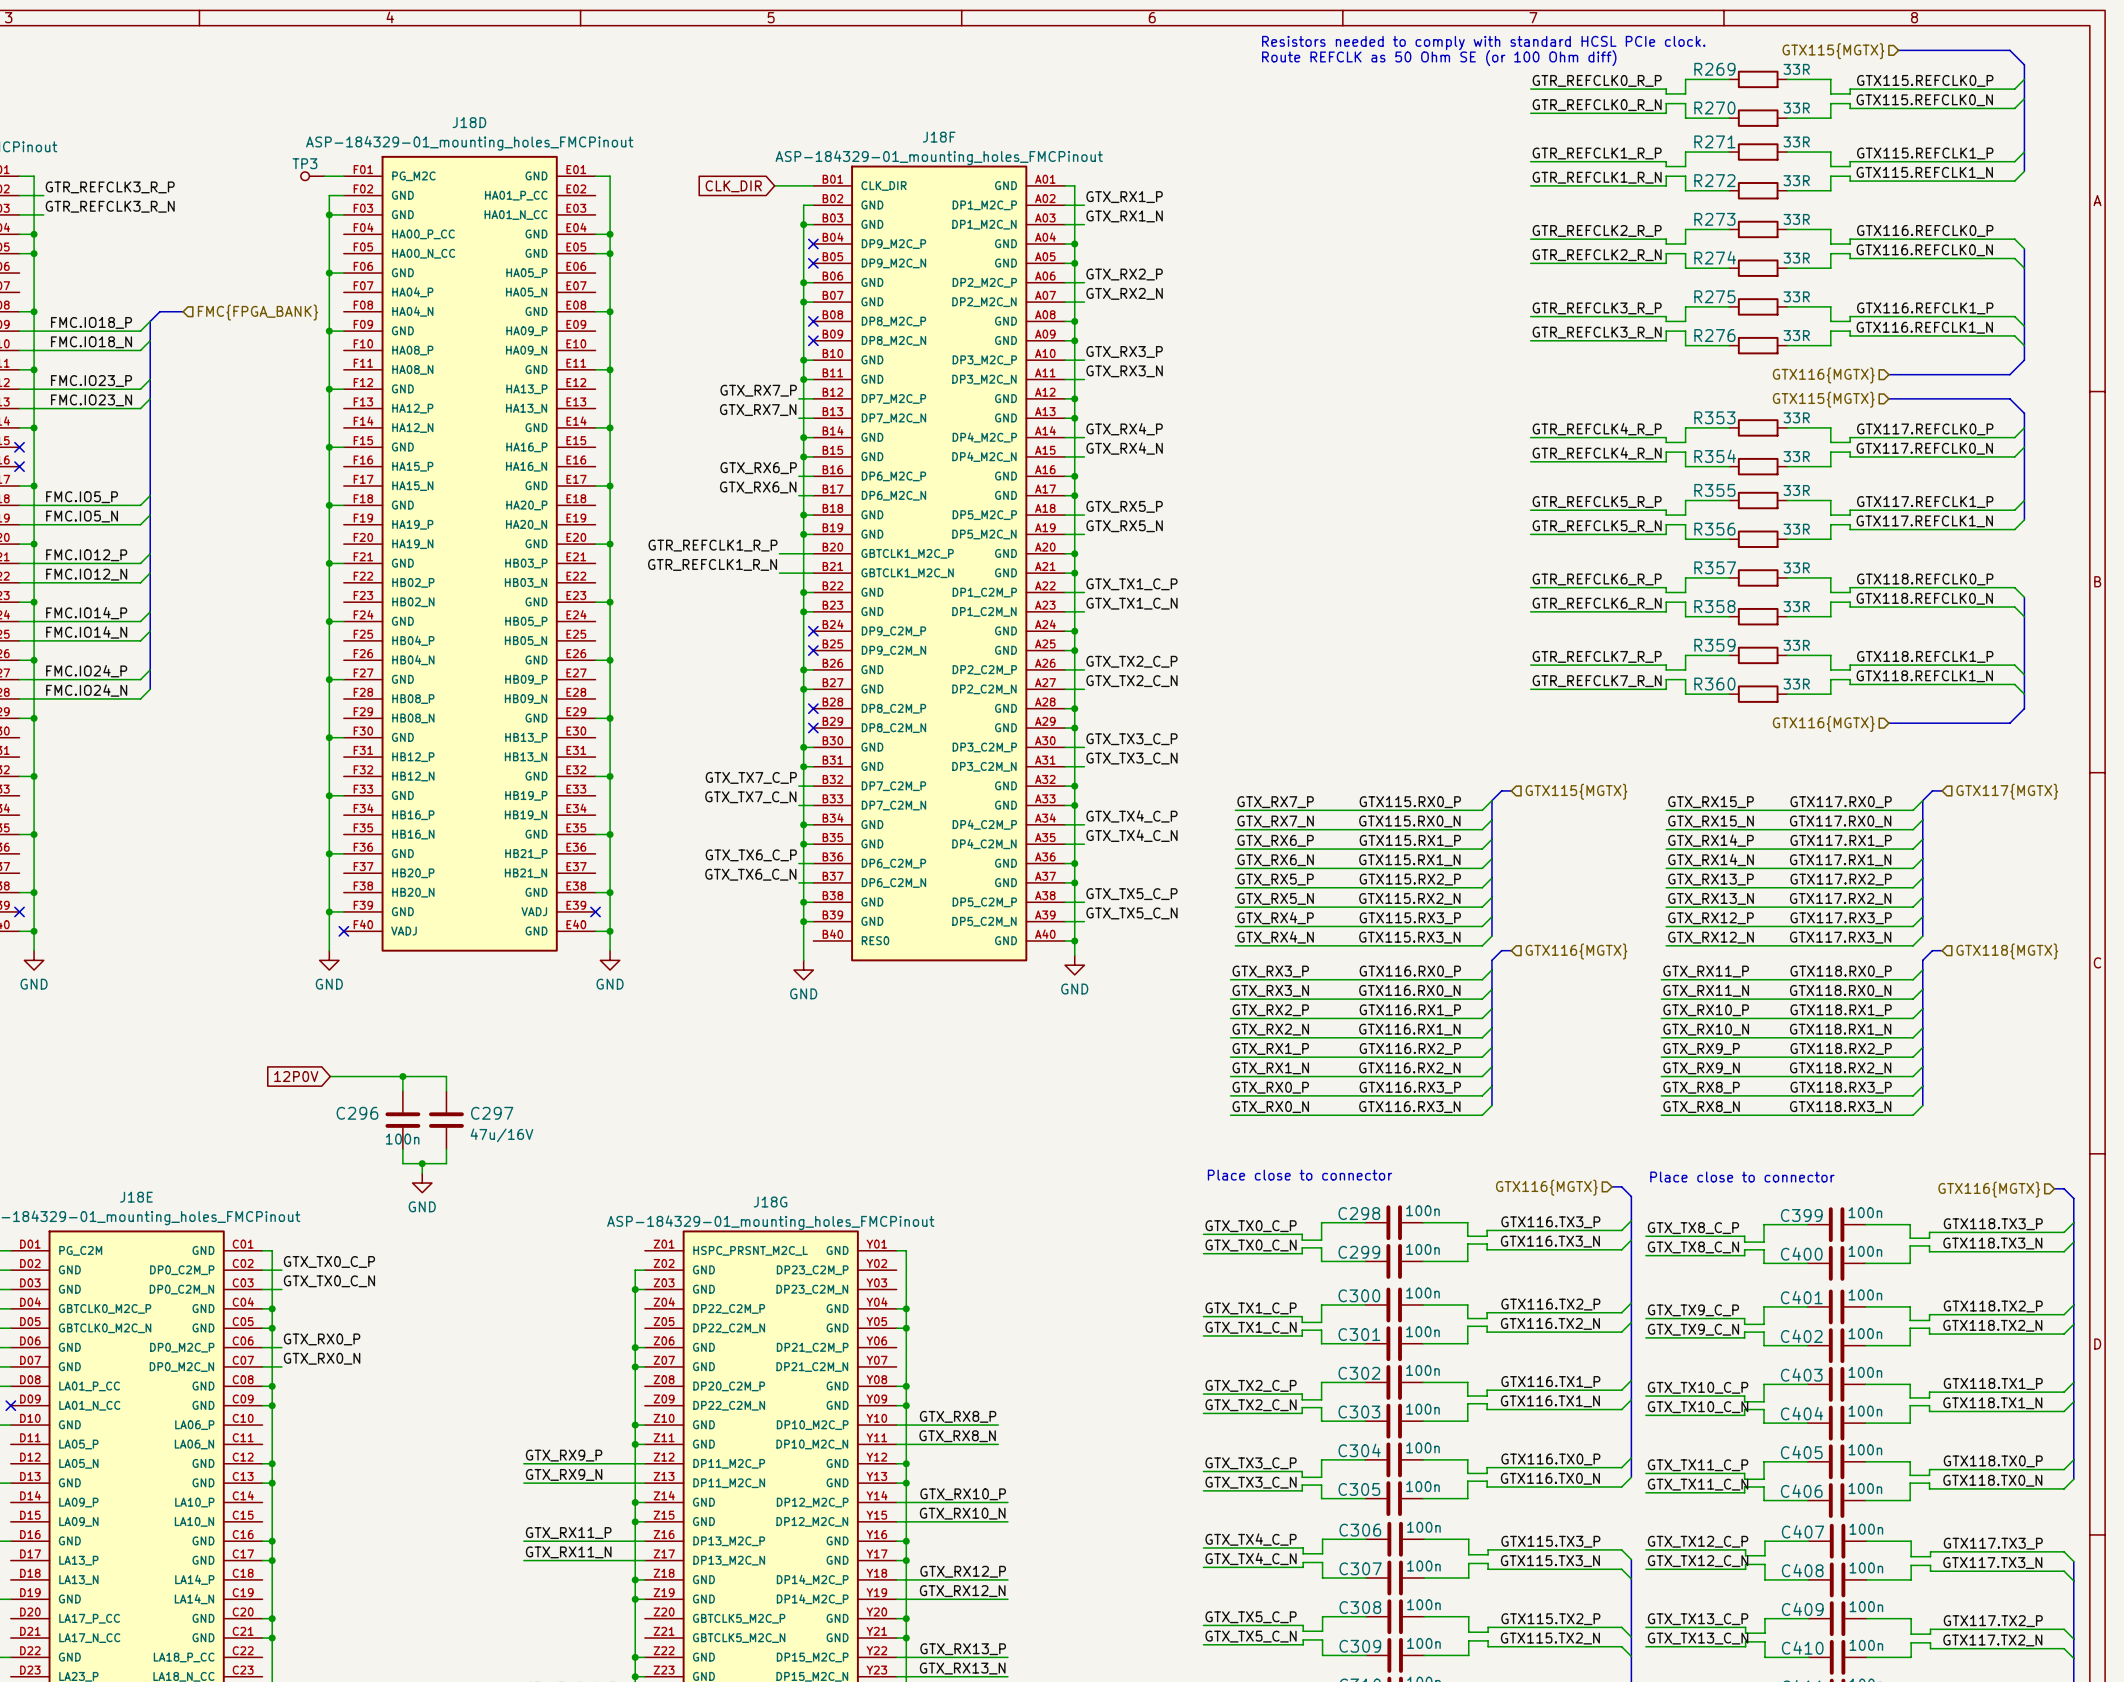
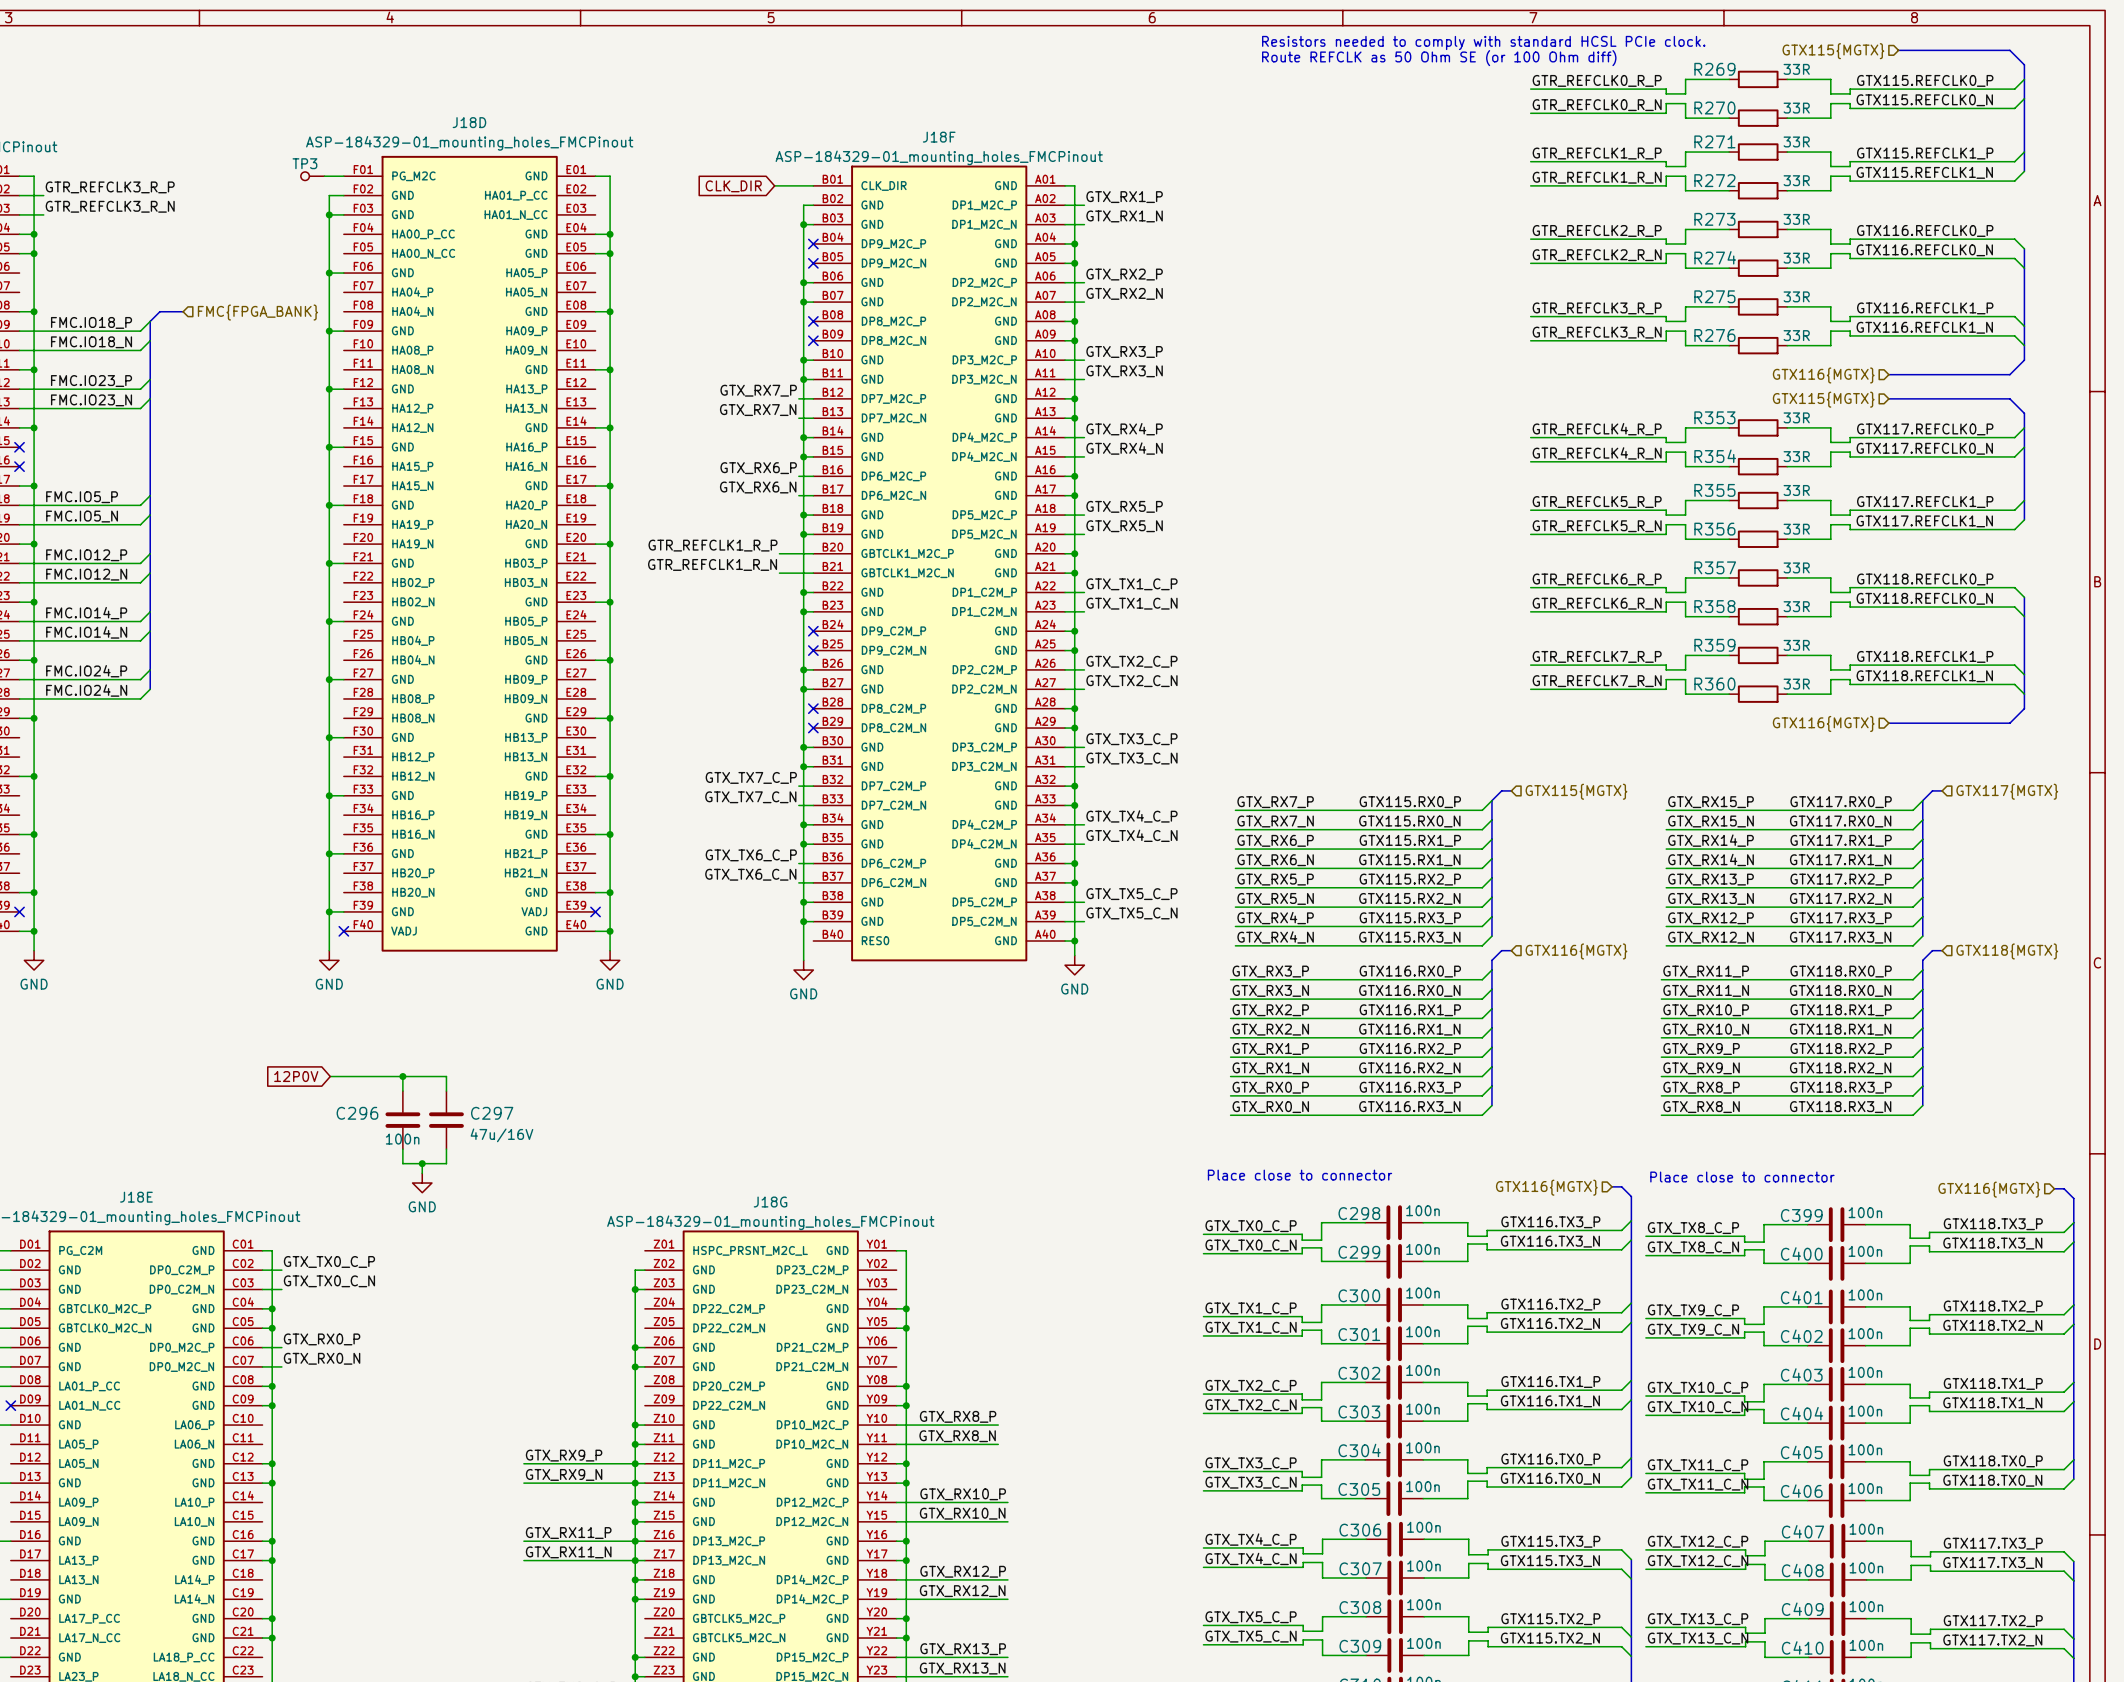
junction: none -> (635, 1463)
junction: none -> (635, 1483)
junction: none -> (635, 1541)
junction: none -> (635, 1560)

